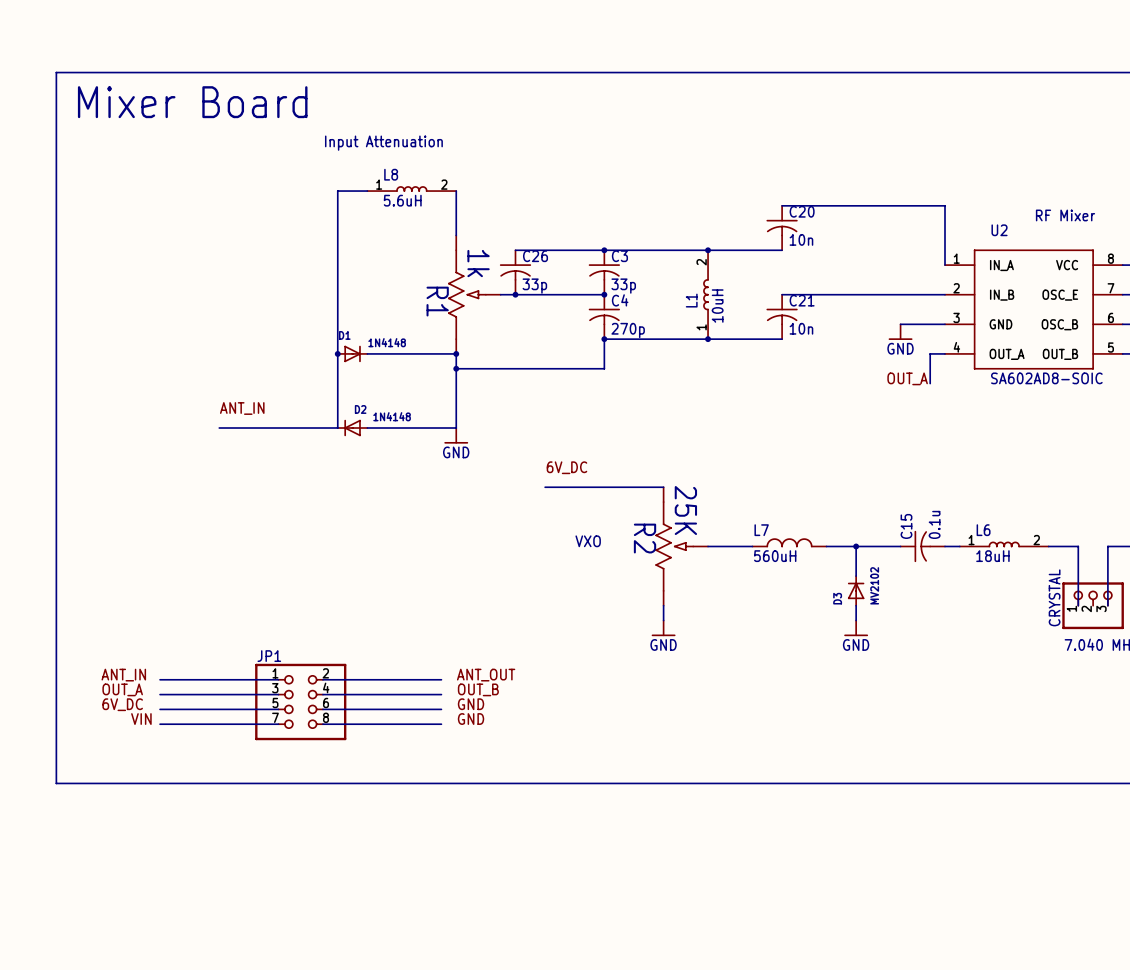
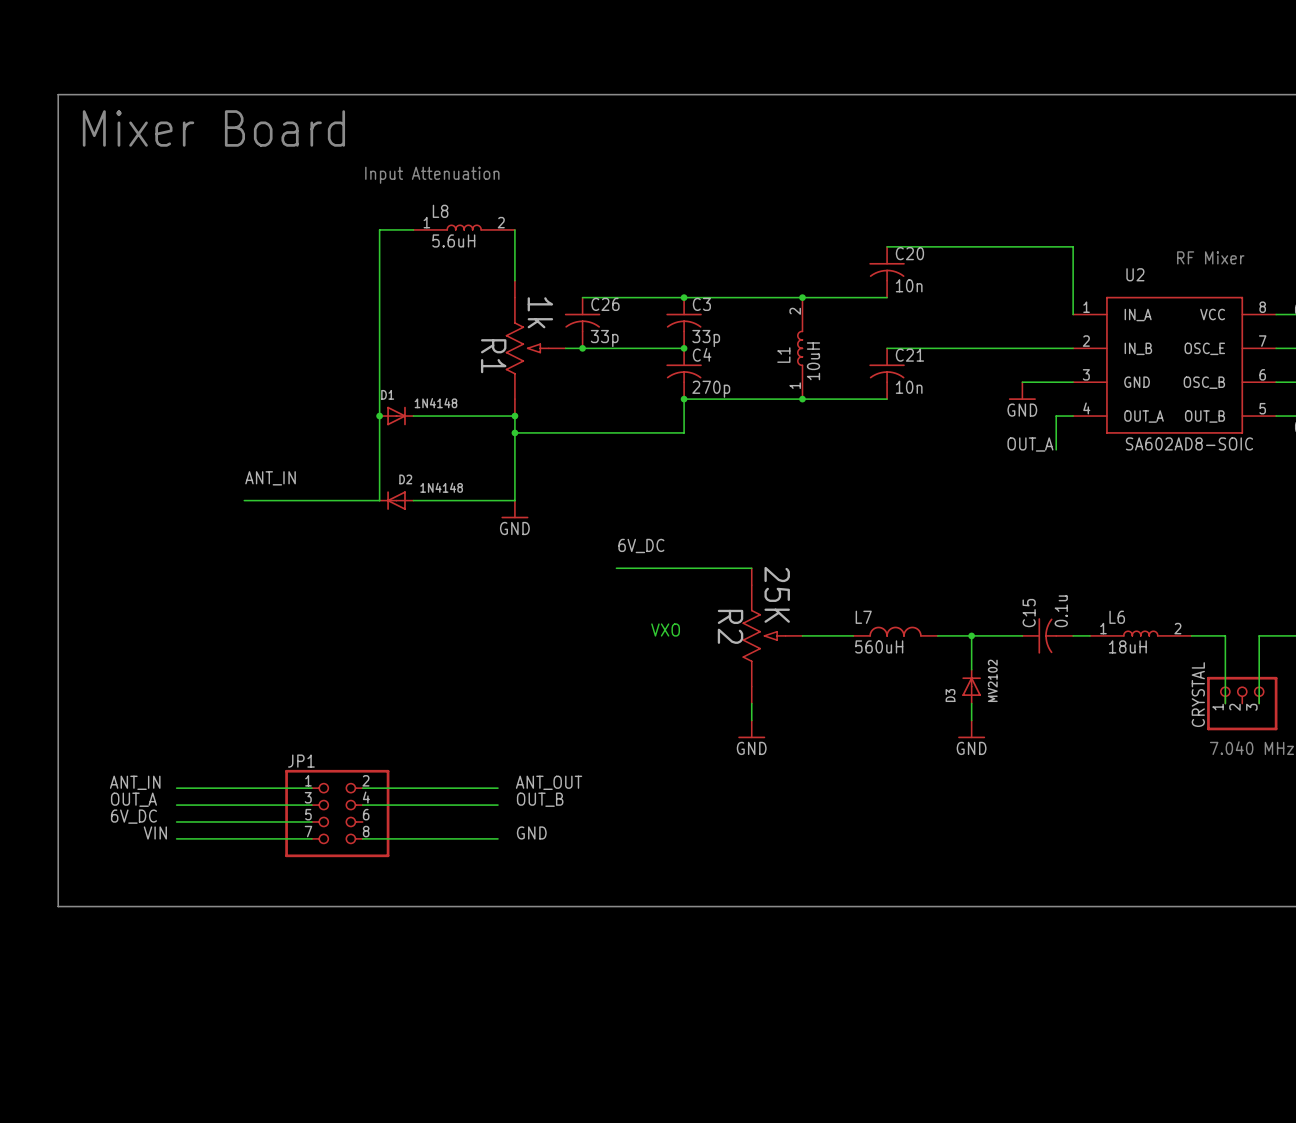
label: GND (471, 704) -> none
wire: (322, 709) (441, 709) -> none

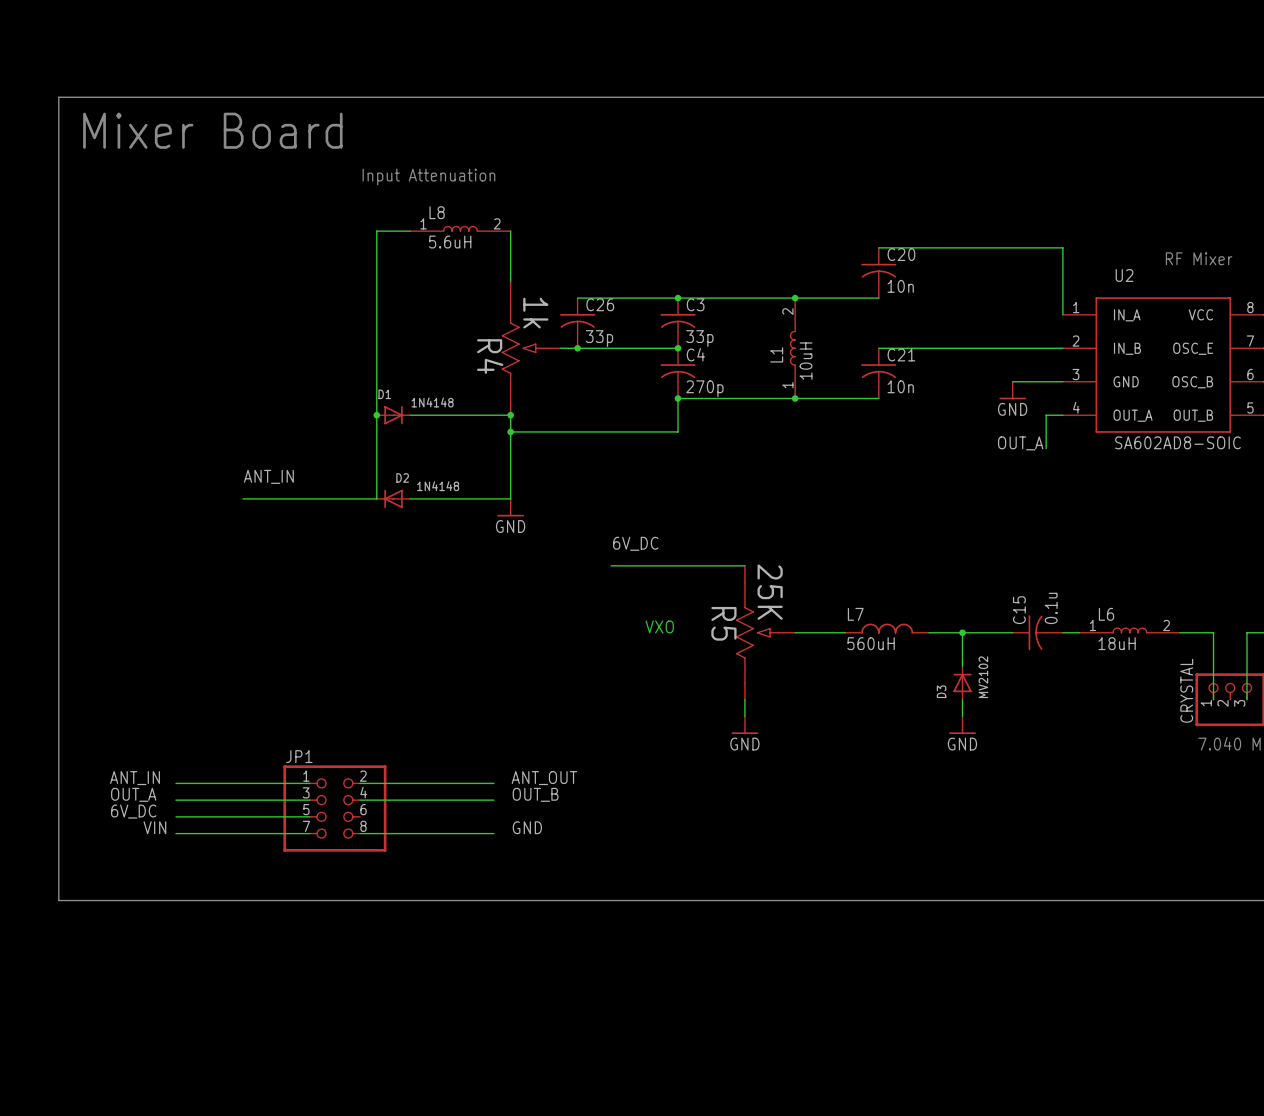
R1 name: R1 (493, 356) -> R4 (490, 356)
R2 name: R2 (730, 626) -> R5 (723, 623)

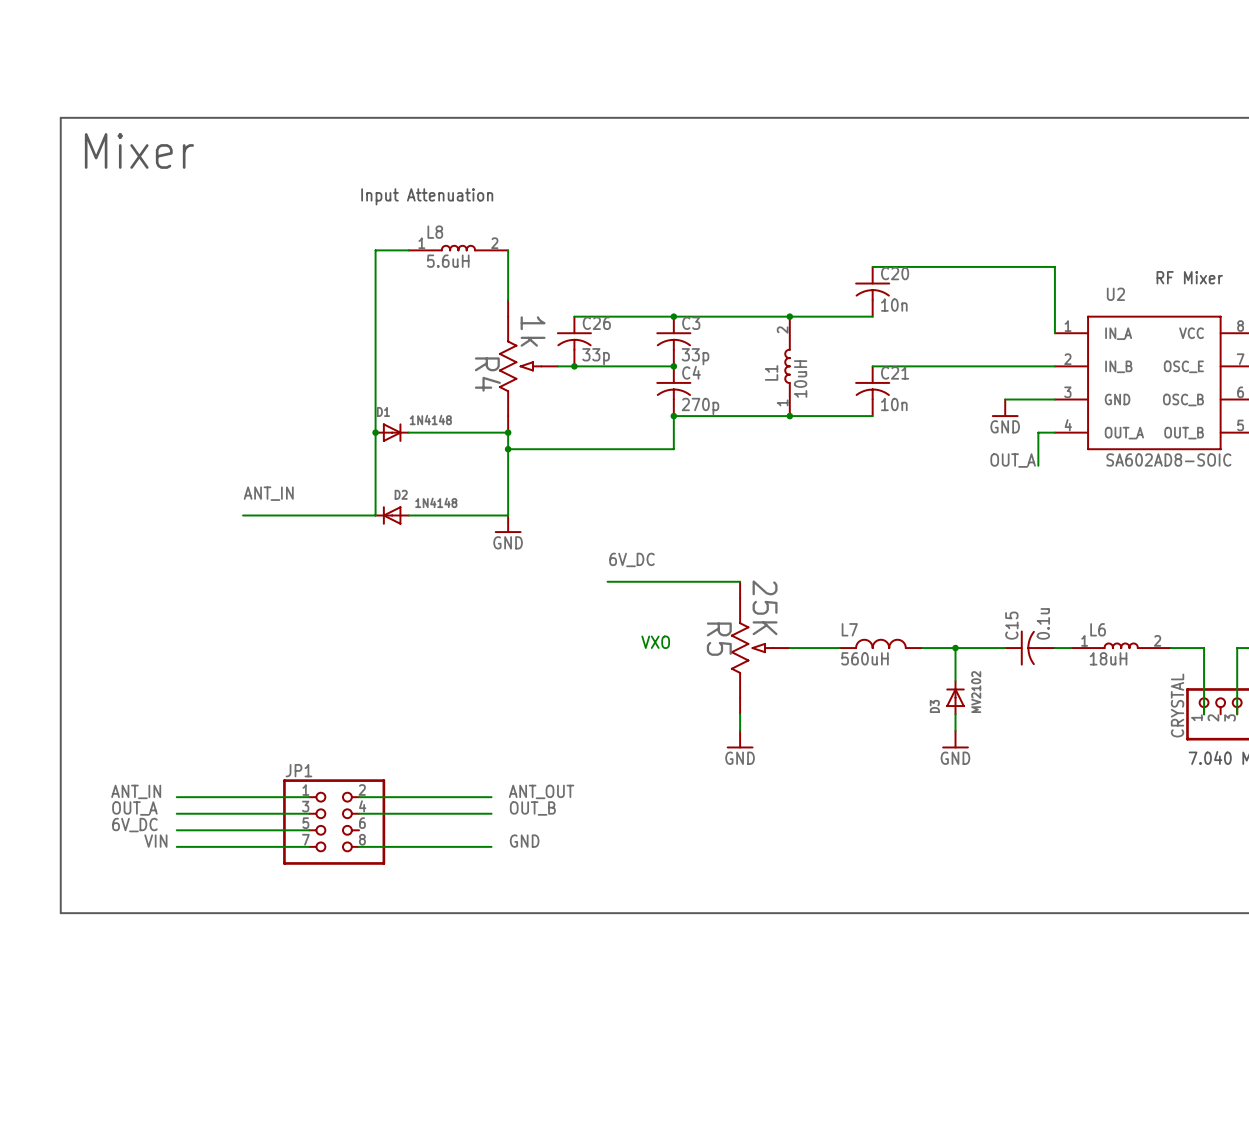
text: Mixer Board (212, 130) -> Mixer (139, 150)

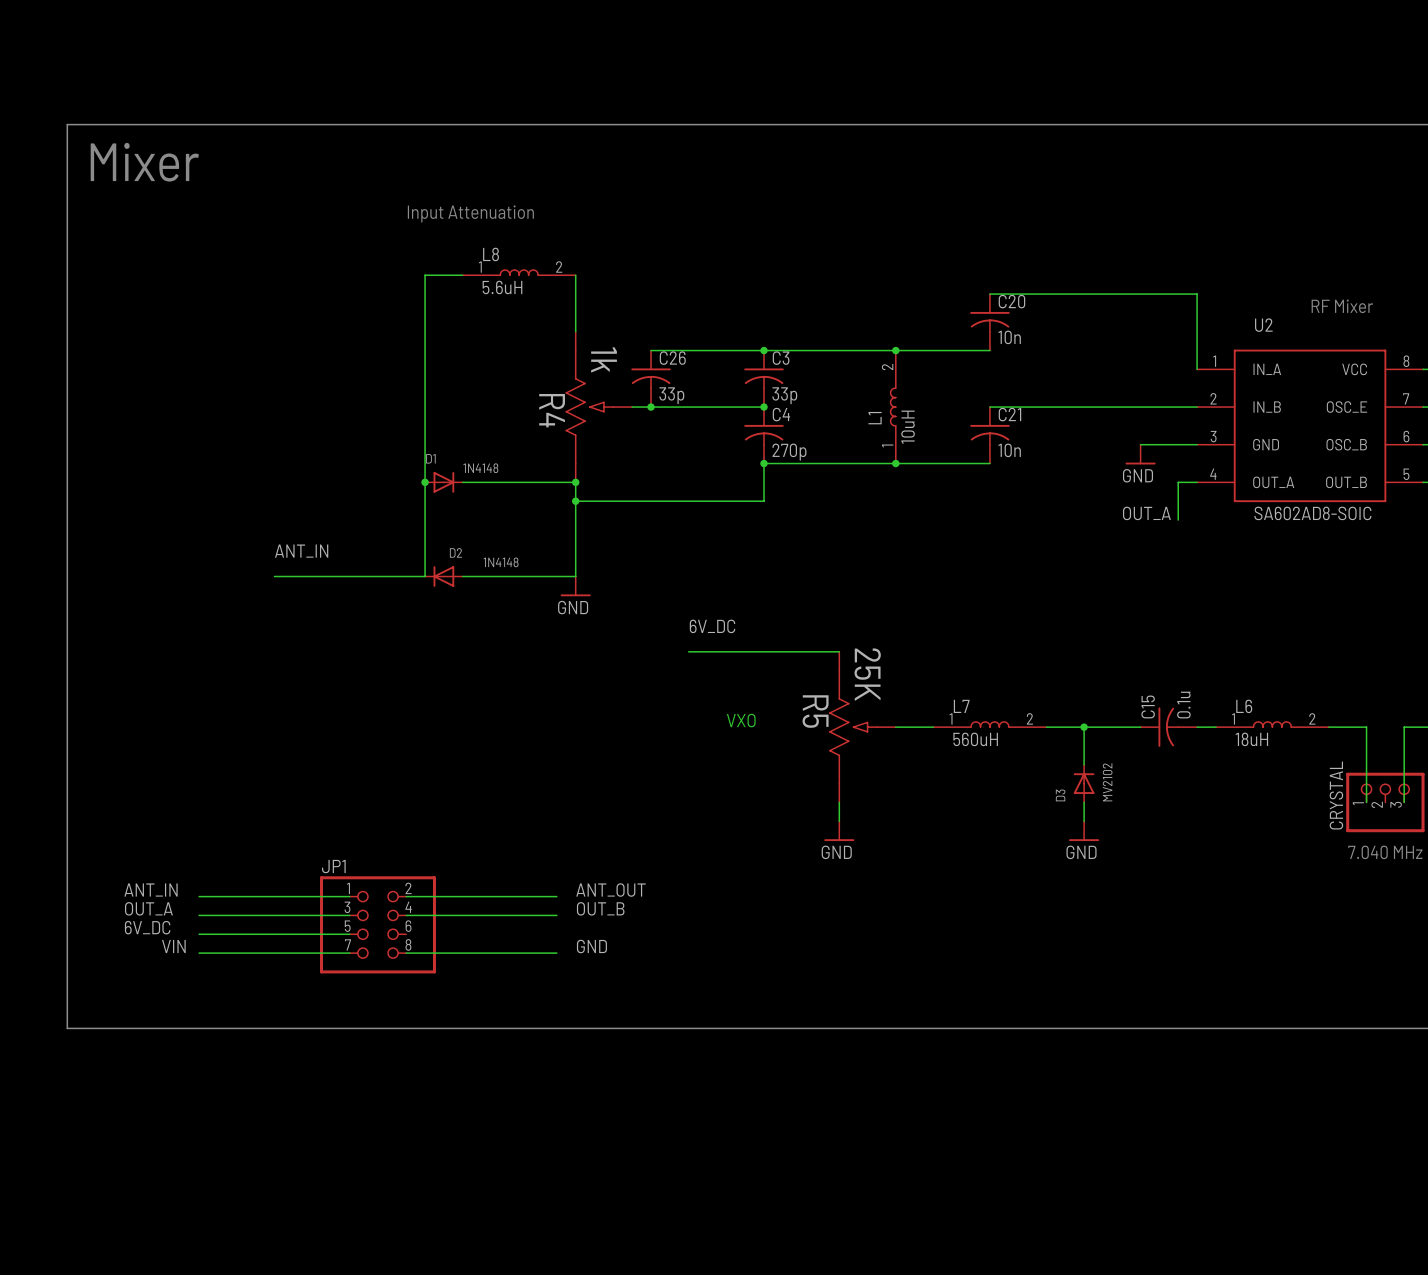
L7 symbol: [839, 638, 923, 649] -> [933, 721, 1047, 728]

